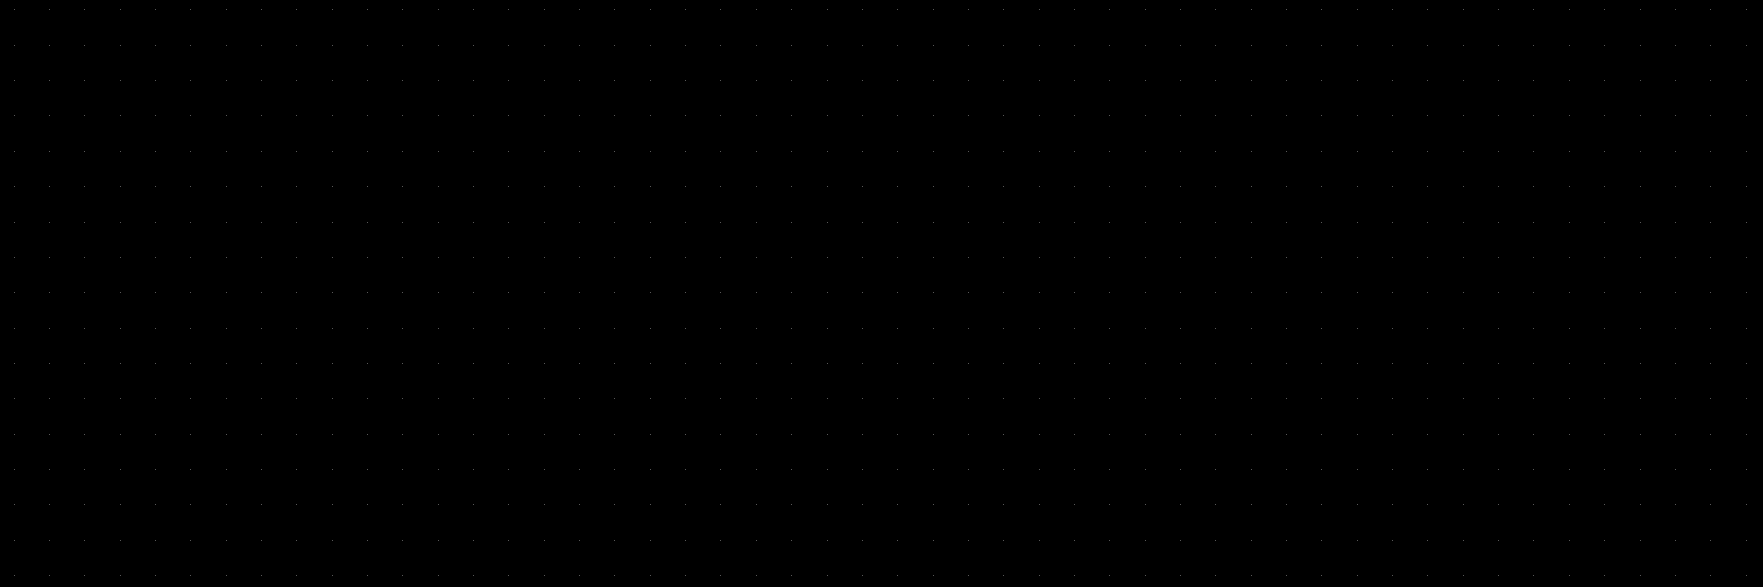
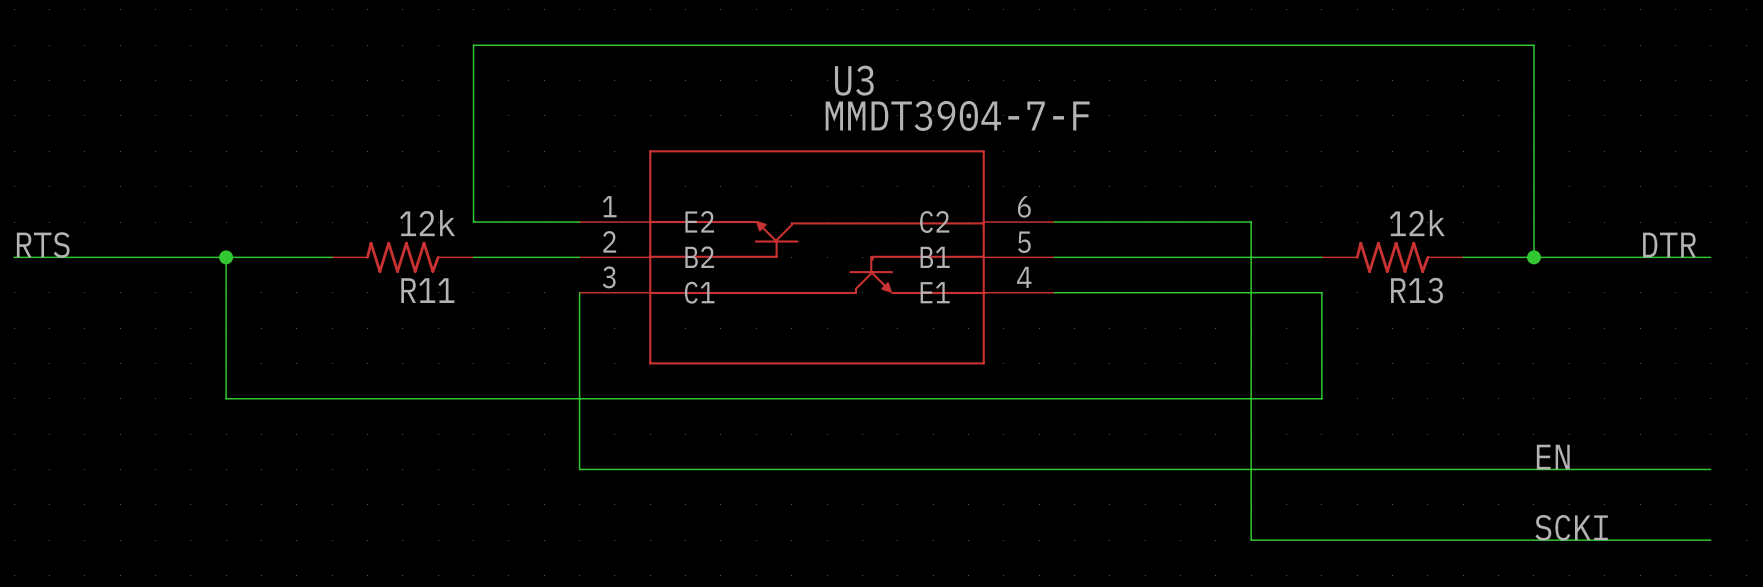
wire: none -> (579, 222) (473, 222) (473, 45) (1533, 45) (1533, 257)
wire: none -> (1054, 222) (1251, 222) (1251, 540) (1710, 540)
label: none -> RTS (43, 244)
label: none -> DTR (1669, 244)
wire: none -> (14, 257) (332, 257)
wire: none -> (226, 257) (226, 398) (1321, 398) (1321, 292) (1054, 292)
junction: none -> (226, 257)
R11: none -> 12k (402, 257)
wire: none -> (473, 257) (579, 257)
U3: none -> MMDT3904-7-F (816, 257)
wire: none -> (1054, 257) (1321, 257)
R13: none -> 12k (1392, 257)
wire: none -> (1463, 257) (1710, 257)
junction: none -> (1533, 257)
wire: none -> (579, 292) (579, 469) (1710, 469)
label: none -> EN (1553, 457)
label: none -> SCKI (1571, 527)

